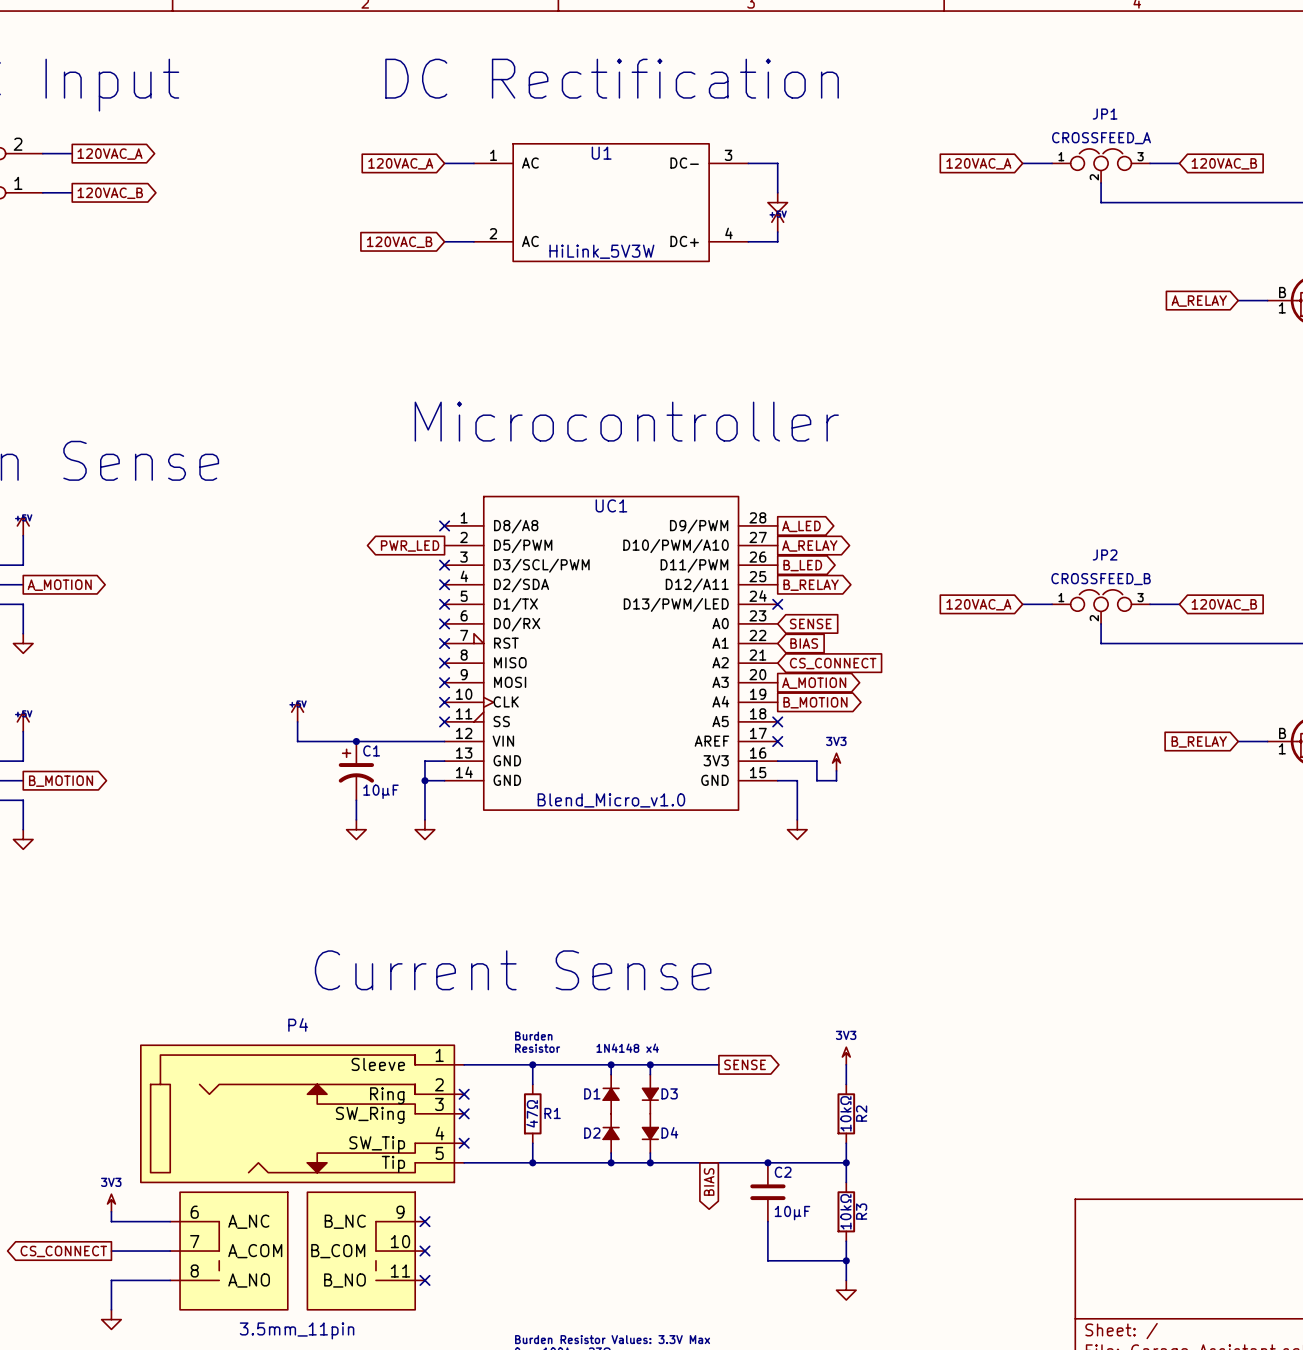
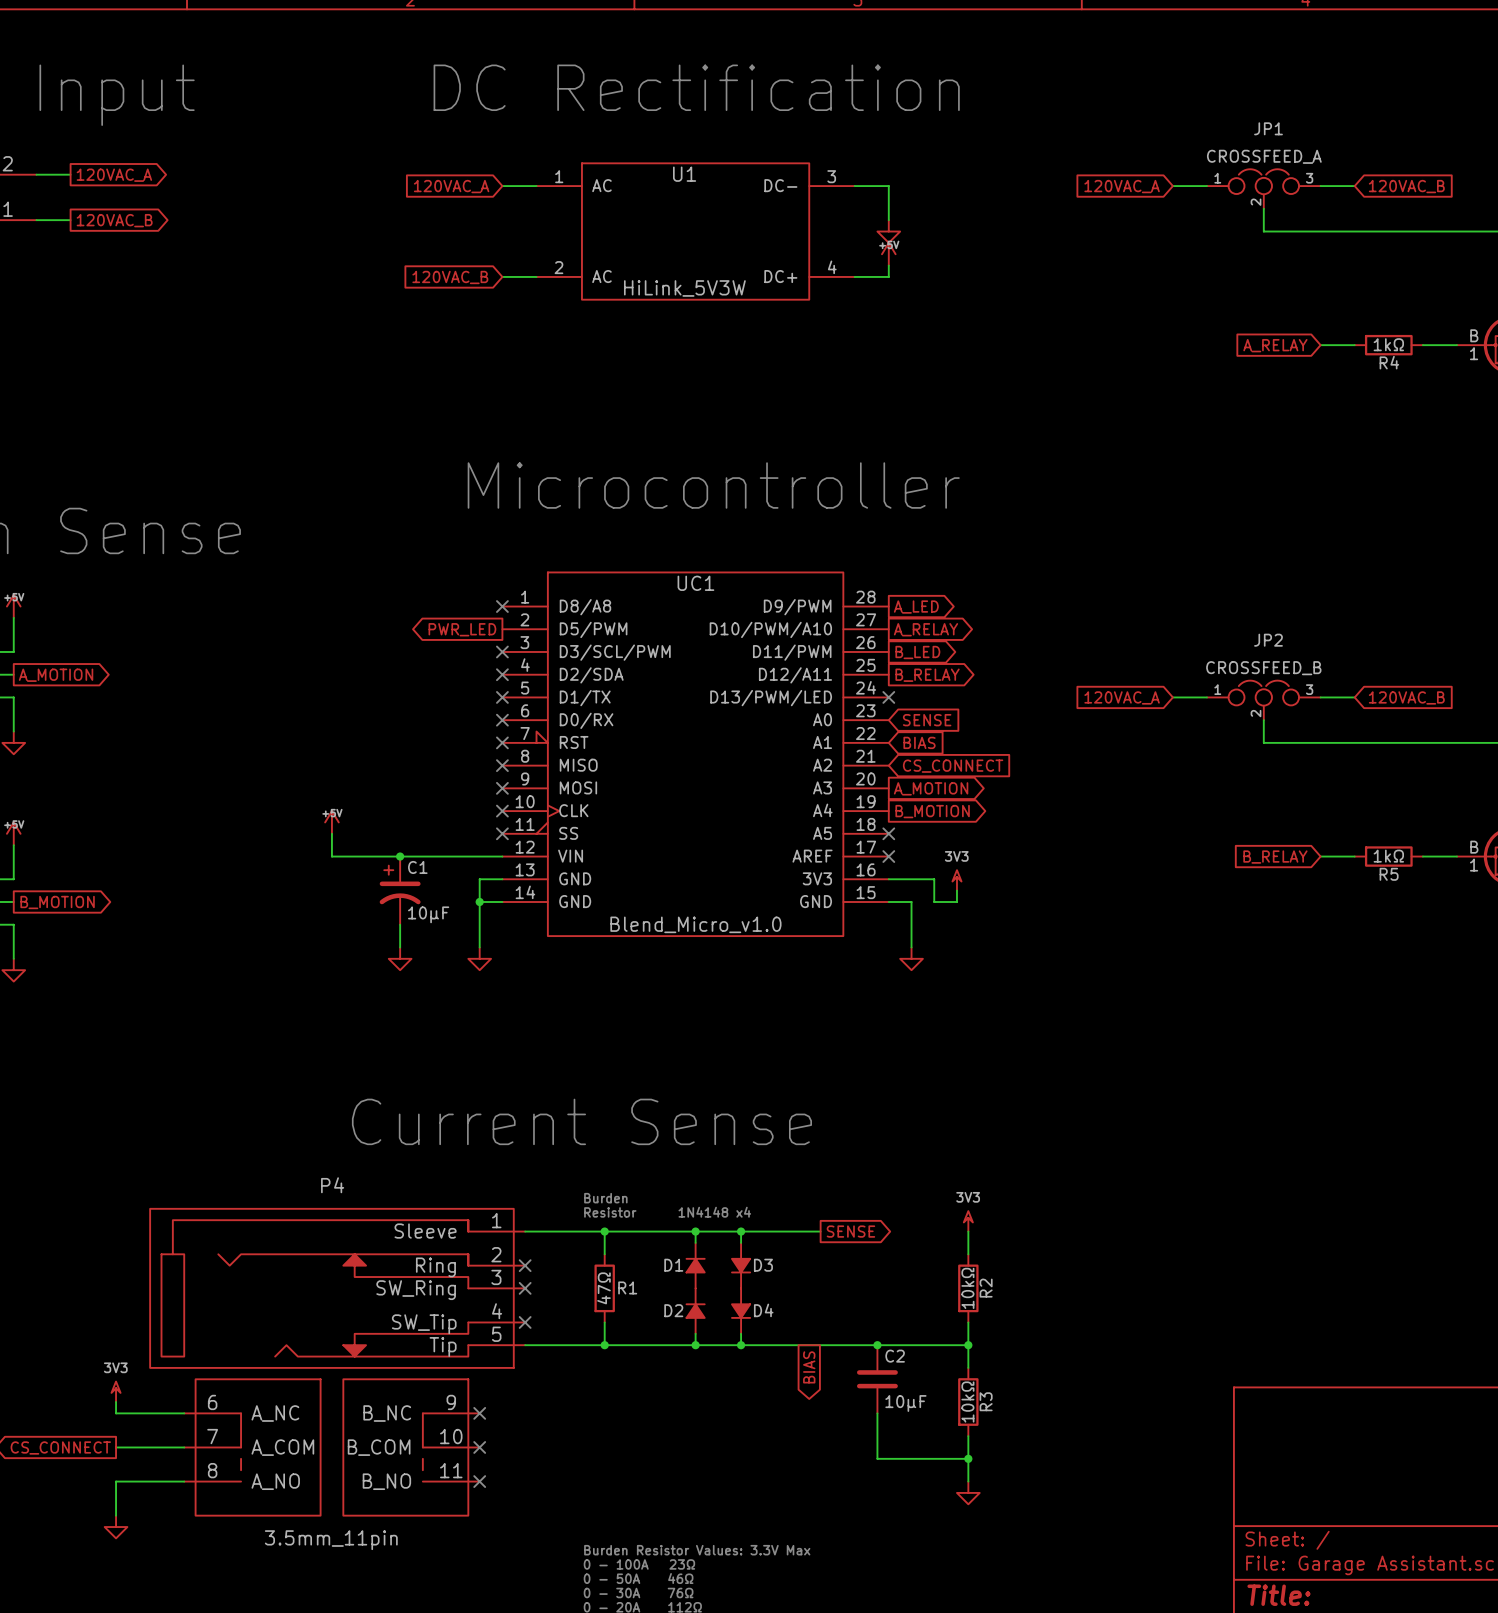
wire: none -> (1320, 345) (1354, 345)
R4: none -> 1kΩ (1388, 345)
global label position: A_RELAY (1199, 301) -> A_RELAY (1275, 345)
wire: none -> (1320, 856) (1354, 856)
global label position: B_RELAY (1199, 741) -> B_RELAY (1275, 857)
R5: none -> 1kΩ (1388, 856)

